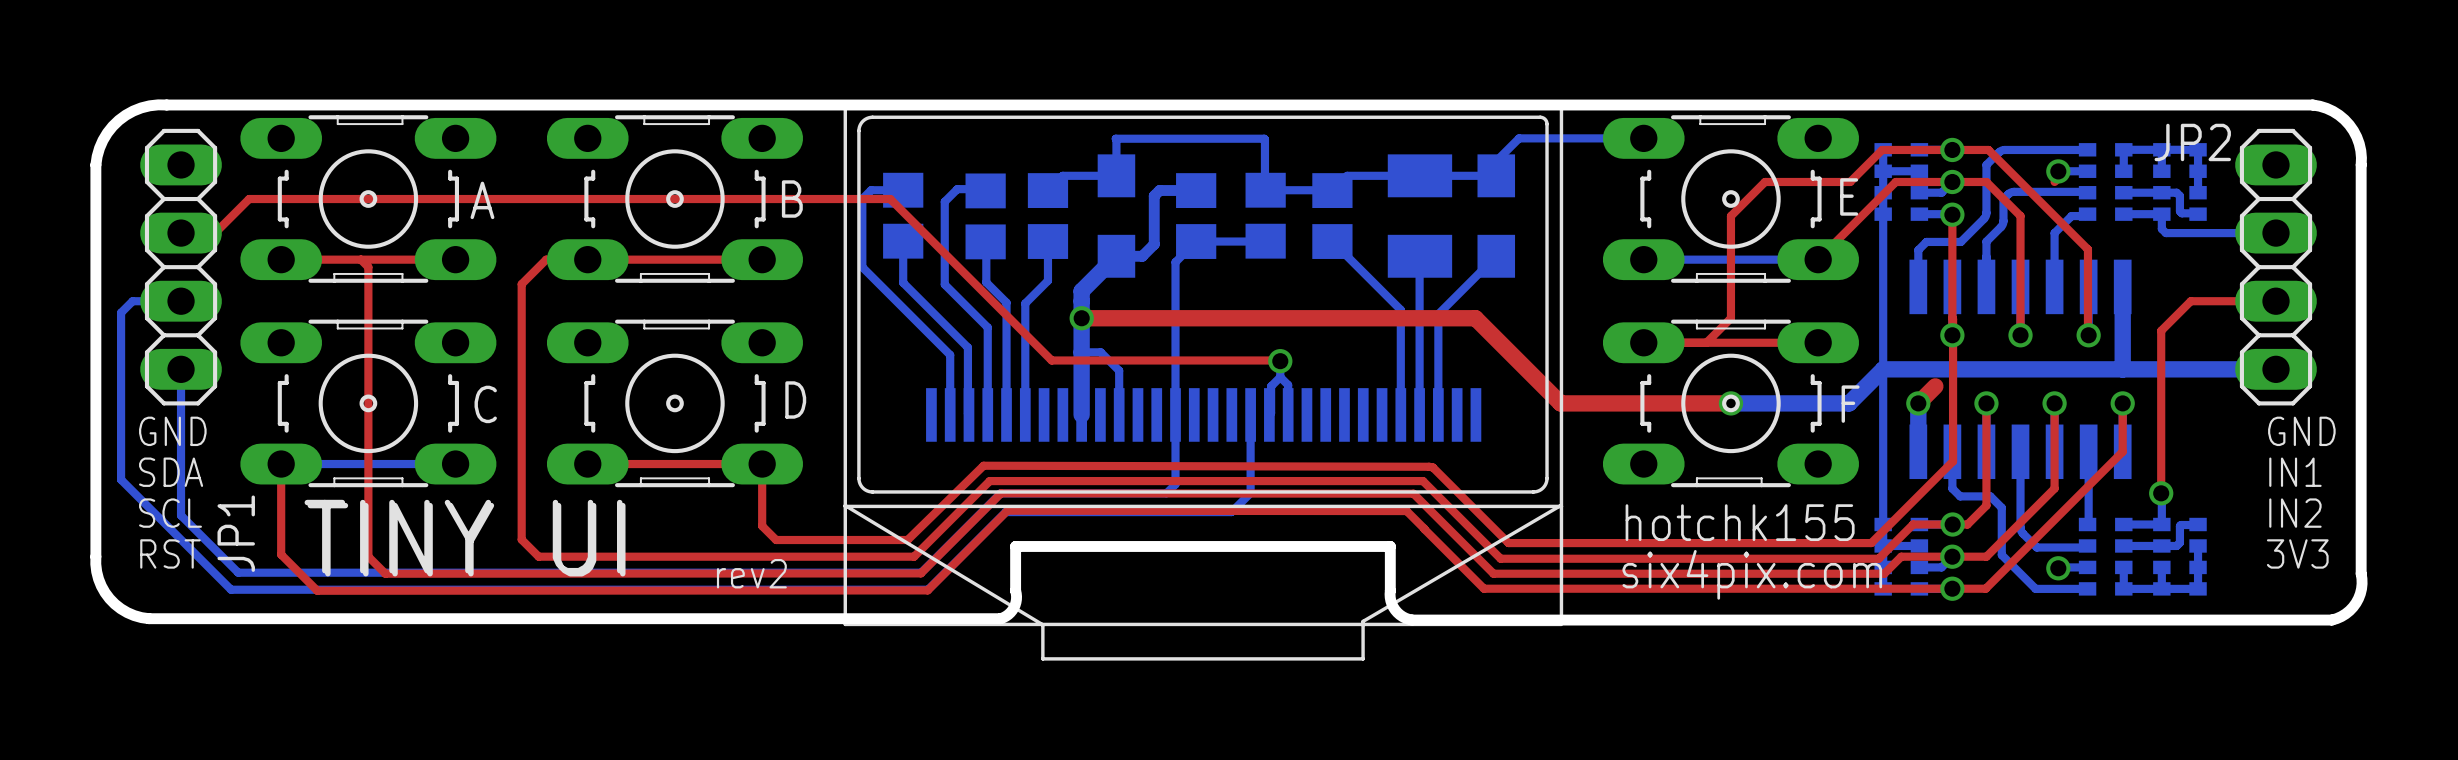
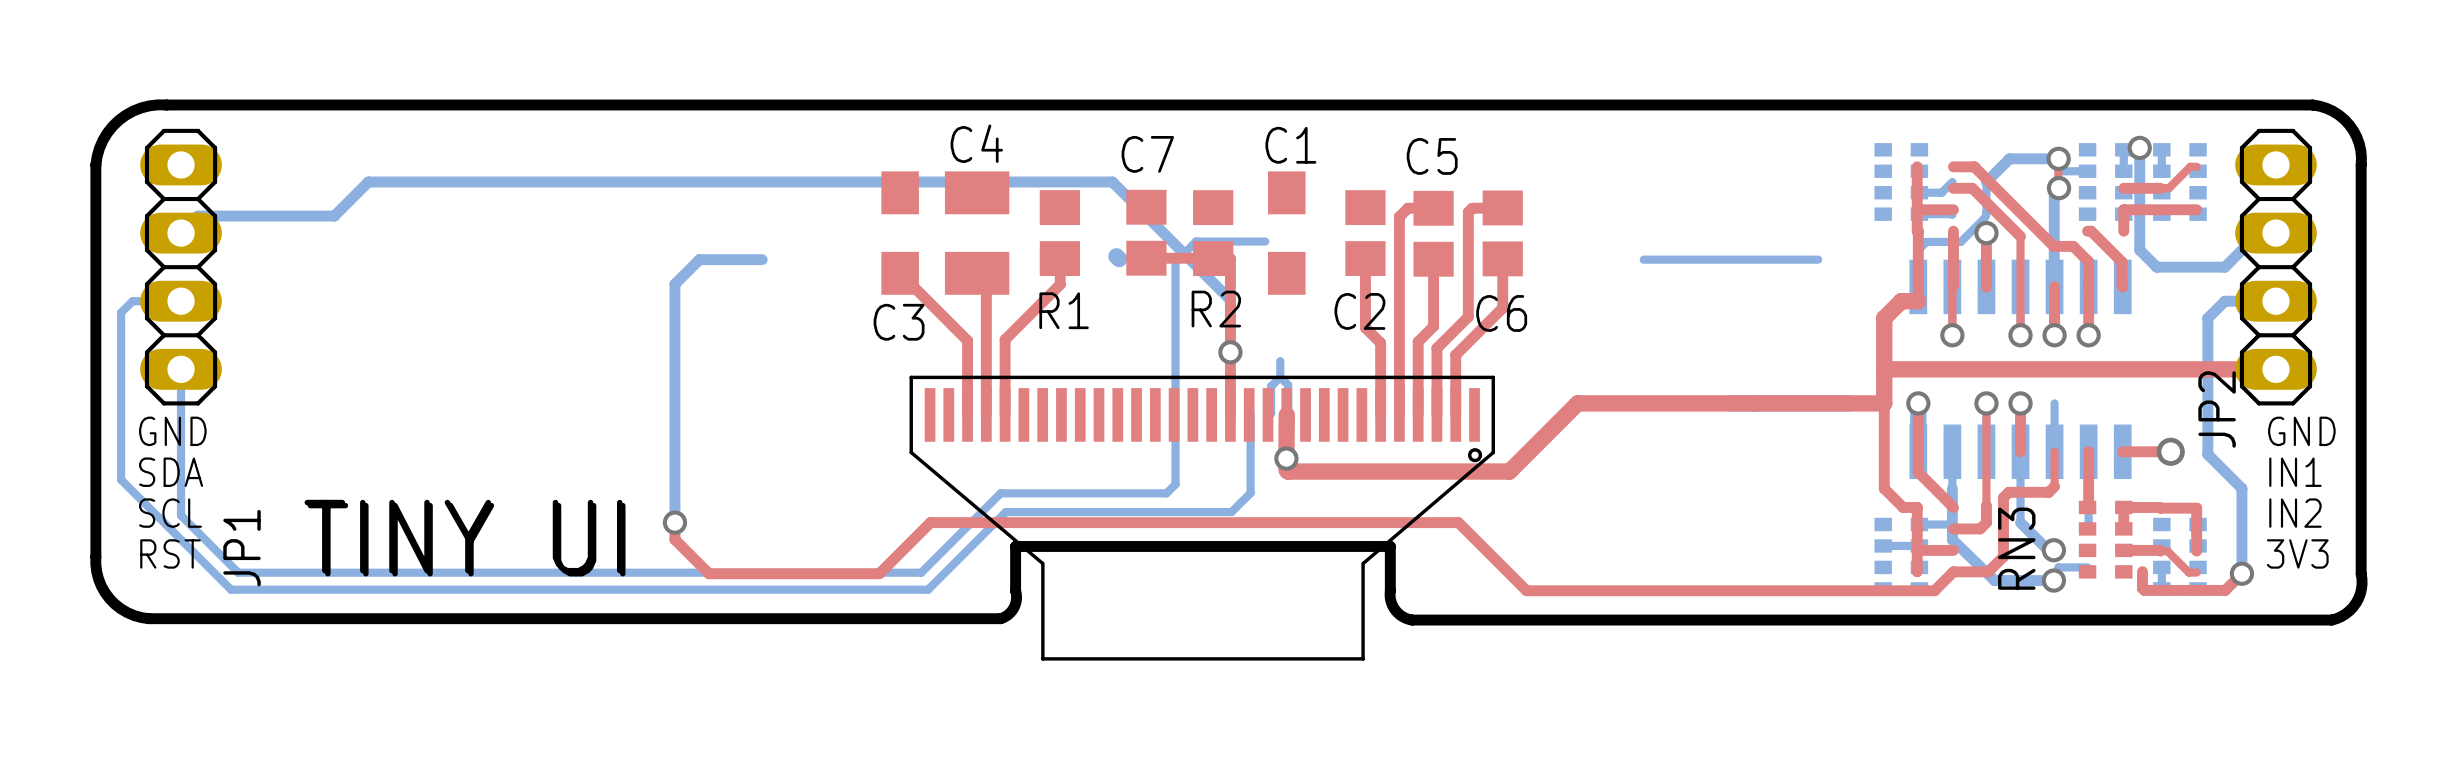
bottom track: (1643, 138) (1519, 138) (1492, 164) (1492, 172) (1496, 175) (1347, 175) (1332, 190) -> none
JP2 name rotation: 0° (2192, 142) -> 90° counterclockwise (2217, 409)
JP2 name position: JP2 (2192, 142) -> JP2 (2217, 409)
via: none -> (2139, 147)
bottom track: (1883, 149) (1883, 588) -> none
via: (1952, 149) -> none
bottom track: (2087, 149) (2002, 150) (1986, 164) (1986, 181) -> (2058, 158) (2009, 158) (1986, 181)
bottom track: (2123, 149) (2198, 149) (2198, 192) -> none
via: none -> (2058, 158)
top track: none -> (1917, 166) (1918, 301) (1901, 301) (1884, 318) (1884, 403)
top track: none -> (2196, 166) (2190, 166) (2168, 188) (2123, 188)
bottom track: (1883, 171) (1919, 171) -> none
via: (2058, 171) -> none
via: (1952, 181) -> none
via: none -> (2059, 188)
bottom track: (903, 190) (871, 190) (862, 199) (862, 267) (950, 355) (950, 414) -> none
bottom track: (985, 190) (983, 189) (957, 189) (944, 201) (944, 284) (987, 327) (987, 414) -> none
bottom track: (1196, 190) (1159, 190) (1154, 195) (1154, 244) (1142, 256) (1116, 256) (1081, 291) (1081, 414) -> none
bottom track: (1332, 190) (1265, 190) (1264, 138) (1115, 138) (1116, 175) (1062, 175) (1047, 190) -> none
bottom track: (2087, 192) (2014, 191) (2008, 194) (2003, 199) (2002, 224) (1986, 241) (1986, 286) -> none
bottom track: (2123, 192) (2176, 192) (2179, 195) (2179, 211) (2181, 213) (2198, 214) -> none
A: (368, 199) -> none
B: (674, 199) -> none
E: (1730, 199) -> none
top track: none -> (1433, 208) (1408, 208) (1399, 216) (1399, 414)
top track: none -> (1502, 208) (1472, 208) (1468, 212) (1468, 316) (1436, 348) (1436, 414)
top track: none -> (1917, 209) (1953, 209)
top track: none -> (2196, 209) (2123, 209) (2123, 231)
top track: (1952, 214) (1952, 286) -> (1953, 231) (1952, 286)
via: (1952, 214) -> none
bottom track: (2087, 214) (2085, 216) (2071, 216) (2054, 233) (2054, 286) -> (2059, 188) (2054, 191) (2054, 286)
bottom track: (2123, 214) (2161, 214) (2161, 228) (2165, 233) (2258, 233) -> (2139, 147) (2139, 250) (2156, 267) (2224, 267) (2258, 233)
C6 side: bottom (903, 215) -> top (1502, 233)
C7 side: bottom (1265, 215) -> top (1146, 232)
C5 side: bottom (985, 216) -> top (1433, 233)
C2 side: bottom (1047, 216) -> top (1365, 233)
C1 side: bottom (1116, 216) -> top (1286, 233)
R2 side: bottom (1196, 216) -> top (1213, 233)
R1 side: bottom (1332, 216) -> top (1059, 233)
C4 side: bottom (1419, 216) -> top (977, 233)
C3 side: bottom (1496, 216) -> top (900, 233)
top track: none -> (2087, 231) (2091, 231) (2122, 262) (2122, 286)
bottom track: none -> (181, 233) (198, 216) (334, 216) (368, 181) (1112, 181) (1230, 299) (1230, 352)
top track: (181, 233) (215, 233) (249, 199) (890, 199) (1051, 360) (1280, 361) -> none
top track: none -> (1986, 233) (1986, 286)
via: none -> (1986, 233)
top track: (2020, 236) (2020, 216) (1986, 181) (1895, 181) (1818, 259) -> (2020, 236) (1972, 188) (1953, 188)
bottom track: (903, 241) (903, 282) (967, 347) (968, 414) -> none
bottom track: (985, 241) (986, 282) (1006, 302) (1006, 414) -> none
bottom track: (1332, 241) (1400, 309) (1400, 414) -> none
bottom track: (1059, 242) (1047, 241) (1047, 280) (1025, 303) (1025, 414) -> none
bottom track: (1419, 256) (1419, 414) -> none
bottom track: (1496, 256) (1438, 314) (1438, 414) -> none
top track: none -> (1060, 258) (1060, 284) (1005, 339) (1005, 414)
top track: none -> (1146, 258) (1230, 258) (1230, 414)
top track: none -> (1365, 258) (1365, 327) (1380, 342) (1380, 414)
top track: none -> (1502, 258) (1502, 308) (1455, 355) (1455, 414)
top track: (281, 259) (455, 259) -> none
top track: (360, 259) (368, 267) (368, 556) (385, 573) (920, 573) (1000, 493) (1413, 493) (1493, 573) (1884, 573) (1901, 556) (1986, 556) (2054, 486) -> (674, 522) (674, 539) (709, 573) (879, 573) (930, 522) (1458, 522) (1526, 590) (1934, 590) (1953, 571) (1988, 571) (2003, 556) (2003, 497) (2008, 492) (2048, 492) (2054, 486)
bottom track: none -> (762, 259) (699, 259) (674, 284) (674, 522)
top track: (762, 259) (546, 259) (521, 284) (521, 539) (538, 556) (914, 556) (989, 481) (1423, 481) (1500, 558) (1878, 558) (1913, 524) (1967, 524) (1986, 505) -> (1953, 528) (1980, 528) (1986, 522) (1986, 505)
top track: none -> (1433, 259) (1433, 326) (1418, 341) (1418, 414)
top track: none -> (900, 273) (967, 340) (967, 414)
top track: none -> (977, 273) (986, 282) (986, 414)
top track: none -> (2054, 286) (2054, 335)
bottom track: (2122, 286) (2122, 369) -> none
bottom track: none -> (2276, 301) (2224, 301) (2207, 318) (2207, 454) (2241, 488) (2241, 573)
top track: (2276, 301) (2190, 301) (2161, 330) (2161, 493) -> none
top track: (1081, 318) (1475, 318) (1560, 403) (1577, 403) -> (1286, 414) (1288, 471) (1509, 471) (1577, 403)
via: (1081, 318) -> none
top track: (1952, 318) (1953, 461) (1871, 543) (1508, 543) (1432, 467) (1429, 466) (983, 465) (907, 540) (776, 540) (762, 526) (762, 464) (587, 464) -> none
via: none -> (2054, 335)
top track: (2088, 335) (2087, 249) (1988, 149) (1882, 149) (1850, 181) (1765, 181) (1730, 216) (1730, 318) (1706, 342) -> (2088, 335) (2088, 261) (2073, 246) (2053, 246) (1974, 166) (1953, 166)
top track: (1643, 342) (1818, 342) -> none
bottom track: (1081, 352) (1100, 352) (1119, 370) (1119, 414) -> none
via: none -> (1230, 352)
via: (1280, 361) -> none
top track: none -> (1884, 369) (2276, 369)
bottom track: (2276, 369) (1883, 369) (1849, 403) -> none
part side: top (1203, 381) -> bottom (1202, 518)
top track: (1935, 386) (1918, 403) -> (1953, 507) (1918, 472) (1918, 403)
C: (368, 403) -> none
D: (674, 403) -> none
top track: none -> (1730, 403) (1884, 403)
F: (1730, 403) -> none
via: (1730, 403) -> none
top track: none -> (1884, 403) (1884, 488) (1903, 507) (1917, 507) (1917, 571)
via: none -> (2020, 403)
top track: (2054, 403) (2054, 451) -> (2020, 403) (2020, 451)
via: (2054, 403) -> none
top track: (2122, 403) (2122, 451) (1985, 588) (1484, 588) (1424, 529) -> none
via: (2122, 403) -> none
top track: none -> (2088, 451) (2087, 507)
top track: none -> (2122, 451) (2171, 451)
via: none -> (2170, 451)
via: none -> (1286, 458)
bottom track: (281, 464) (455, 464) -> none
top track: (281, 464) (281, 554) (317, 590) (927, 590) (1007, 510) (1406, 511) (1424, 528) -> none
bottom track: (1952, 488) (1960, 496) (1990, 496) (2001, 507) (2001, 554) (2035, 588) (2087, 588) -> (1952, 488) (1952, 539) (1994, 580) (2053, 580)
bottom track: (2161, 493) (2161, 524) (2123, 524) -> none
via: (2161, 493) -> none
via: none -> (674, 522)
text: hotchk155 (1740, 522) -> none
bottom track: (2020, 522) (2021, 531) (2036, 547) (2087, 545) -> (2020, 522) (2048, 550) (2053, 550)
via: (1952, 524) -> none
bottom track: (2198, 524) (2179, 526) (2179, 542) (2176, 545) (2123, 545) -> none
top track: none -> (2123, 528) (2123, 507) (2196, 508) (2196, 551)
JP1 name position: JP1 (236, 533) -> JP1 (242, 548)
bottom track: (2198, 545) (2198, 588) (2123, 588) (2123, 567) -> none
top track: none -> (1917, 550) (1953, 550)
via: none -> (2053, 550)
top track: none -> (2123, 550) (2167, 551) (2188, 572) (2196, 572)
bottom track: (1952, 556) (1941, 567) (1919, 567) -> none
via: (1952, 556) -> none
RN3 side: bottom (2105, 556) -> top (2105, 539)
via: (2058, 568) -> none
top track: none -> (2142, 571) (2142, 588) (2144, 590) (2225, 590) (2241, 573)
text: rev2 (751, 573) -> none
via: none -> (2241, 573)
text: six4pix.com (1752, 574) -> none
via: none -> (2053, 580)
via: (1952, 588) -> none

